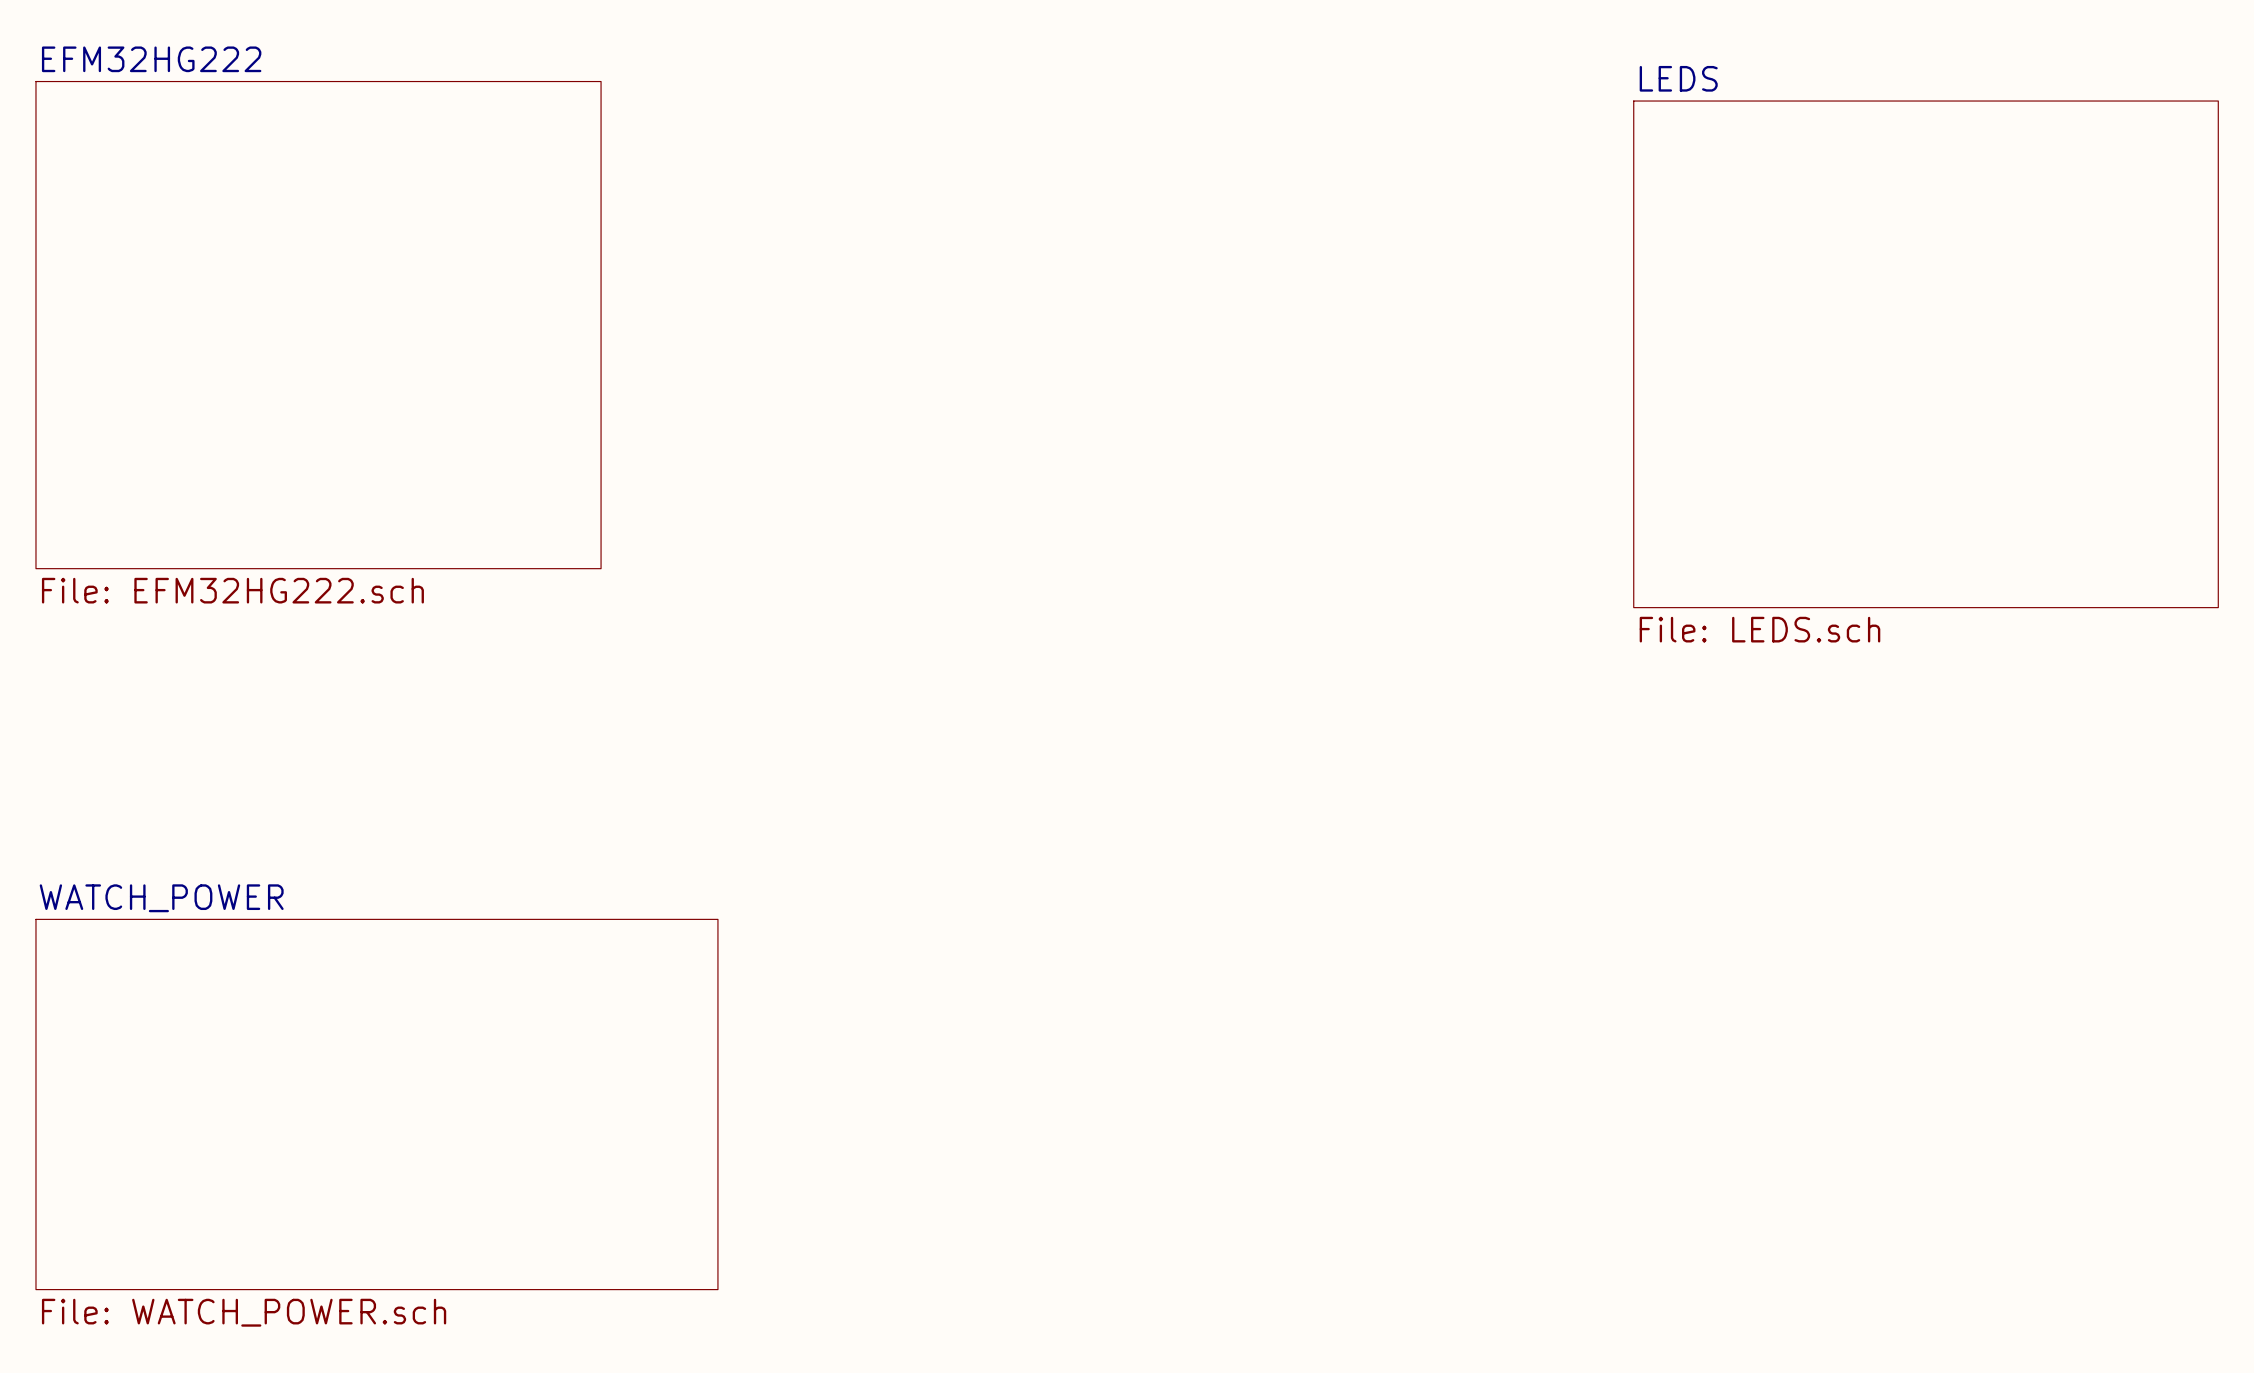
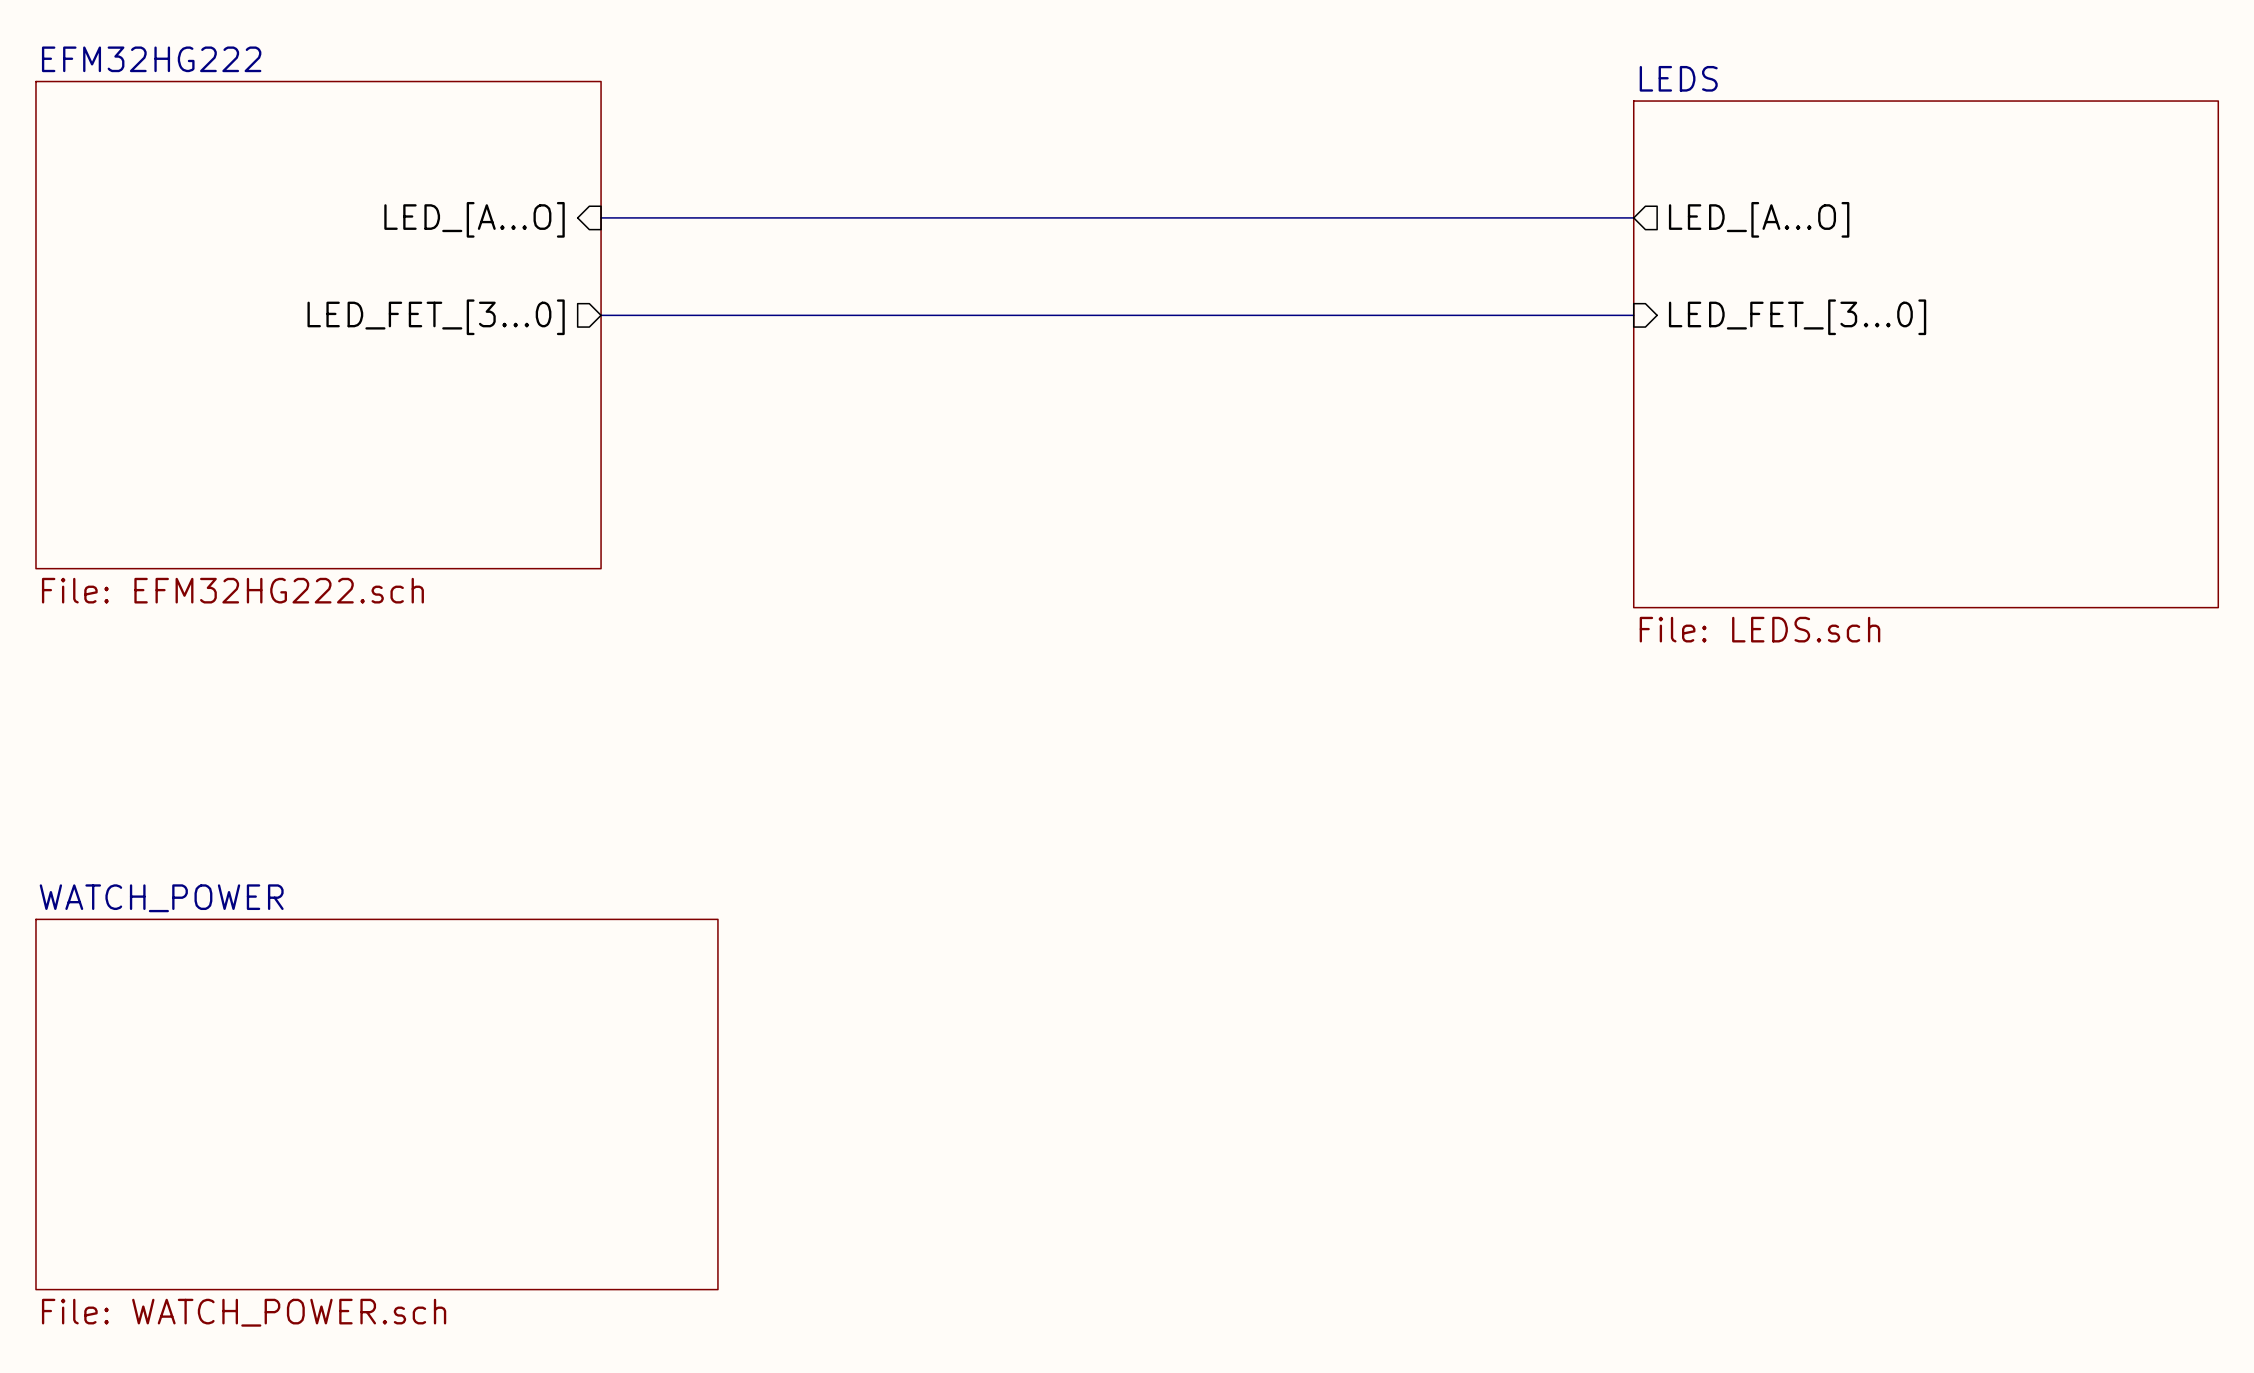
bus: none -> (601, 217) (1633, 217)
sheet pin: none -> LED_[A...O] (474, 219)
sheet pin: none -> LED_[A...O] (1759, 219)
bus: none -> (601, 315) (1633, 315)
sheet pin: none -> LED_FET_[3...0] (436, 317)
sheet pin: none -> LED_FET_[3...0] (1797, 317)

